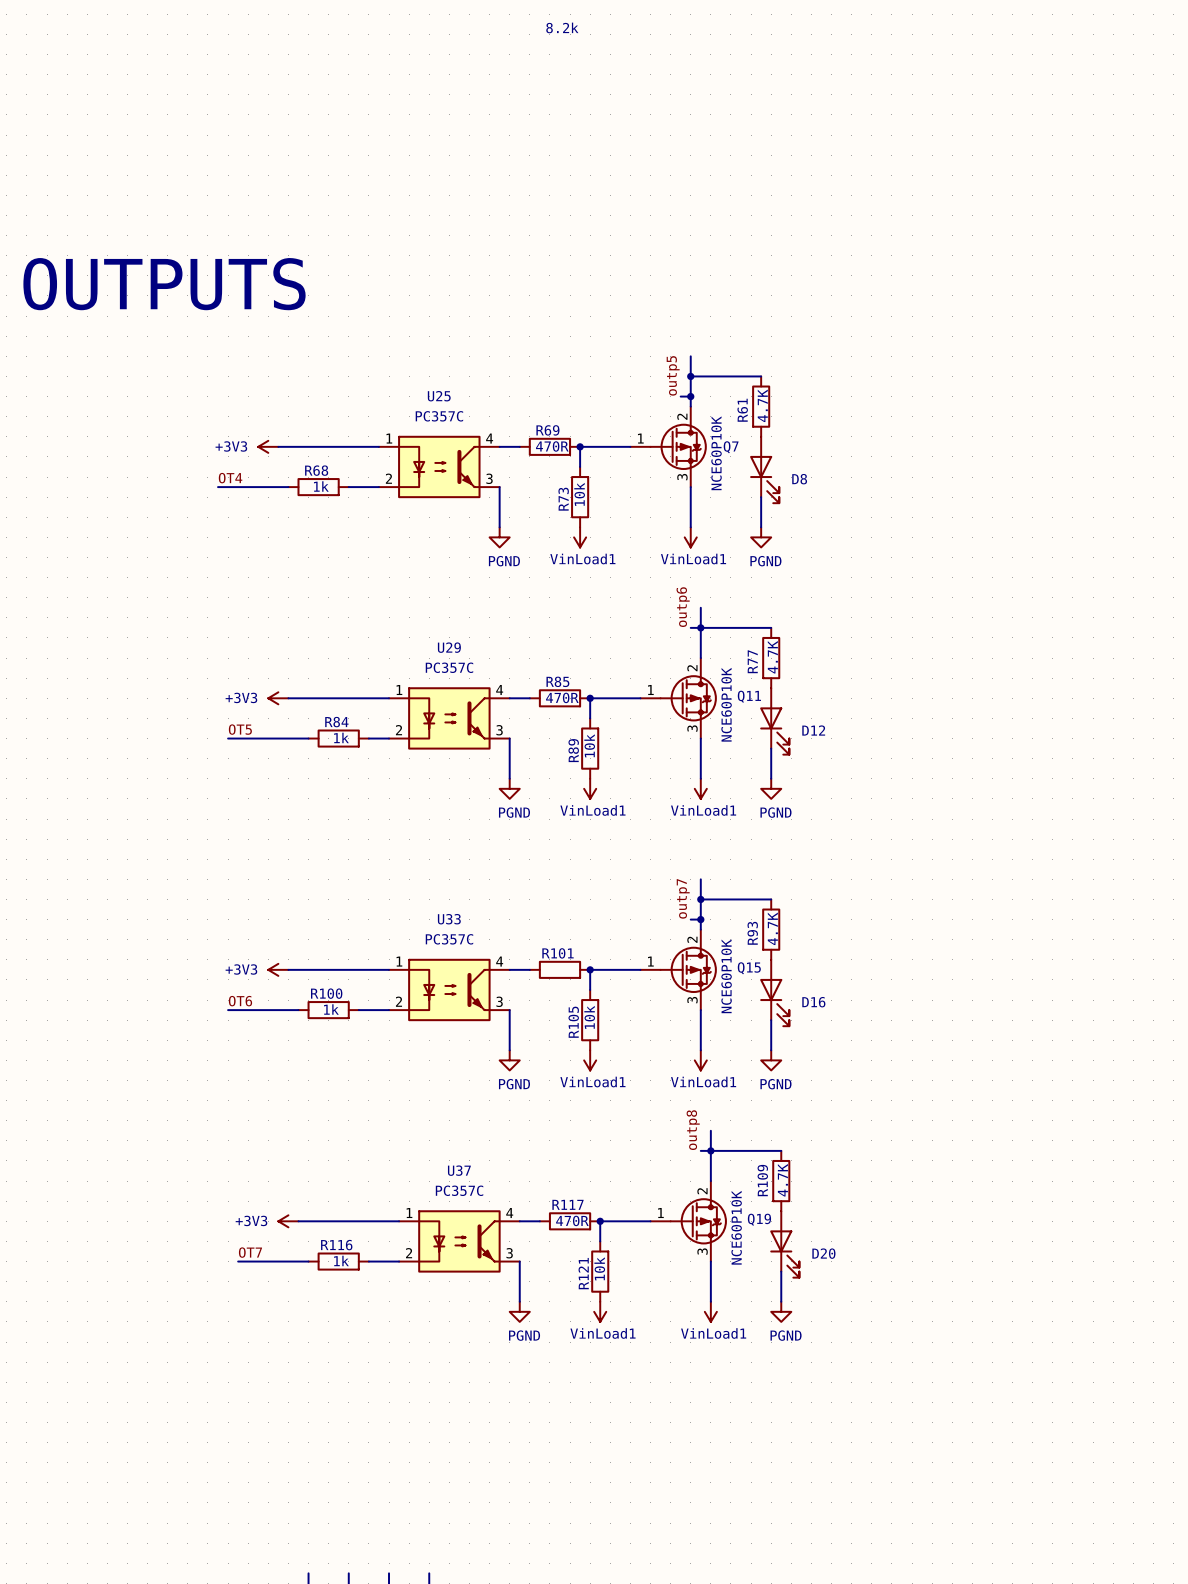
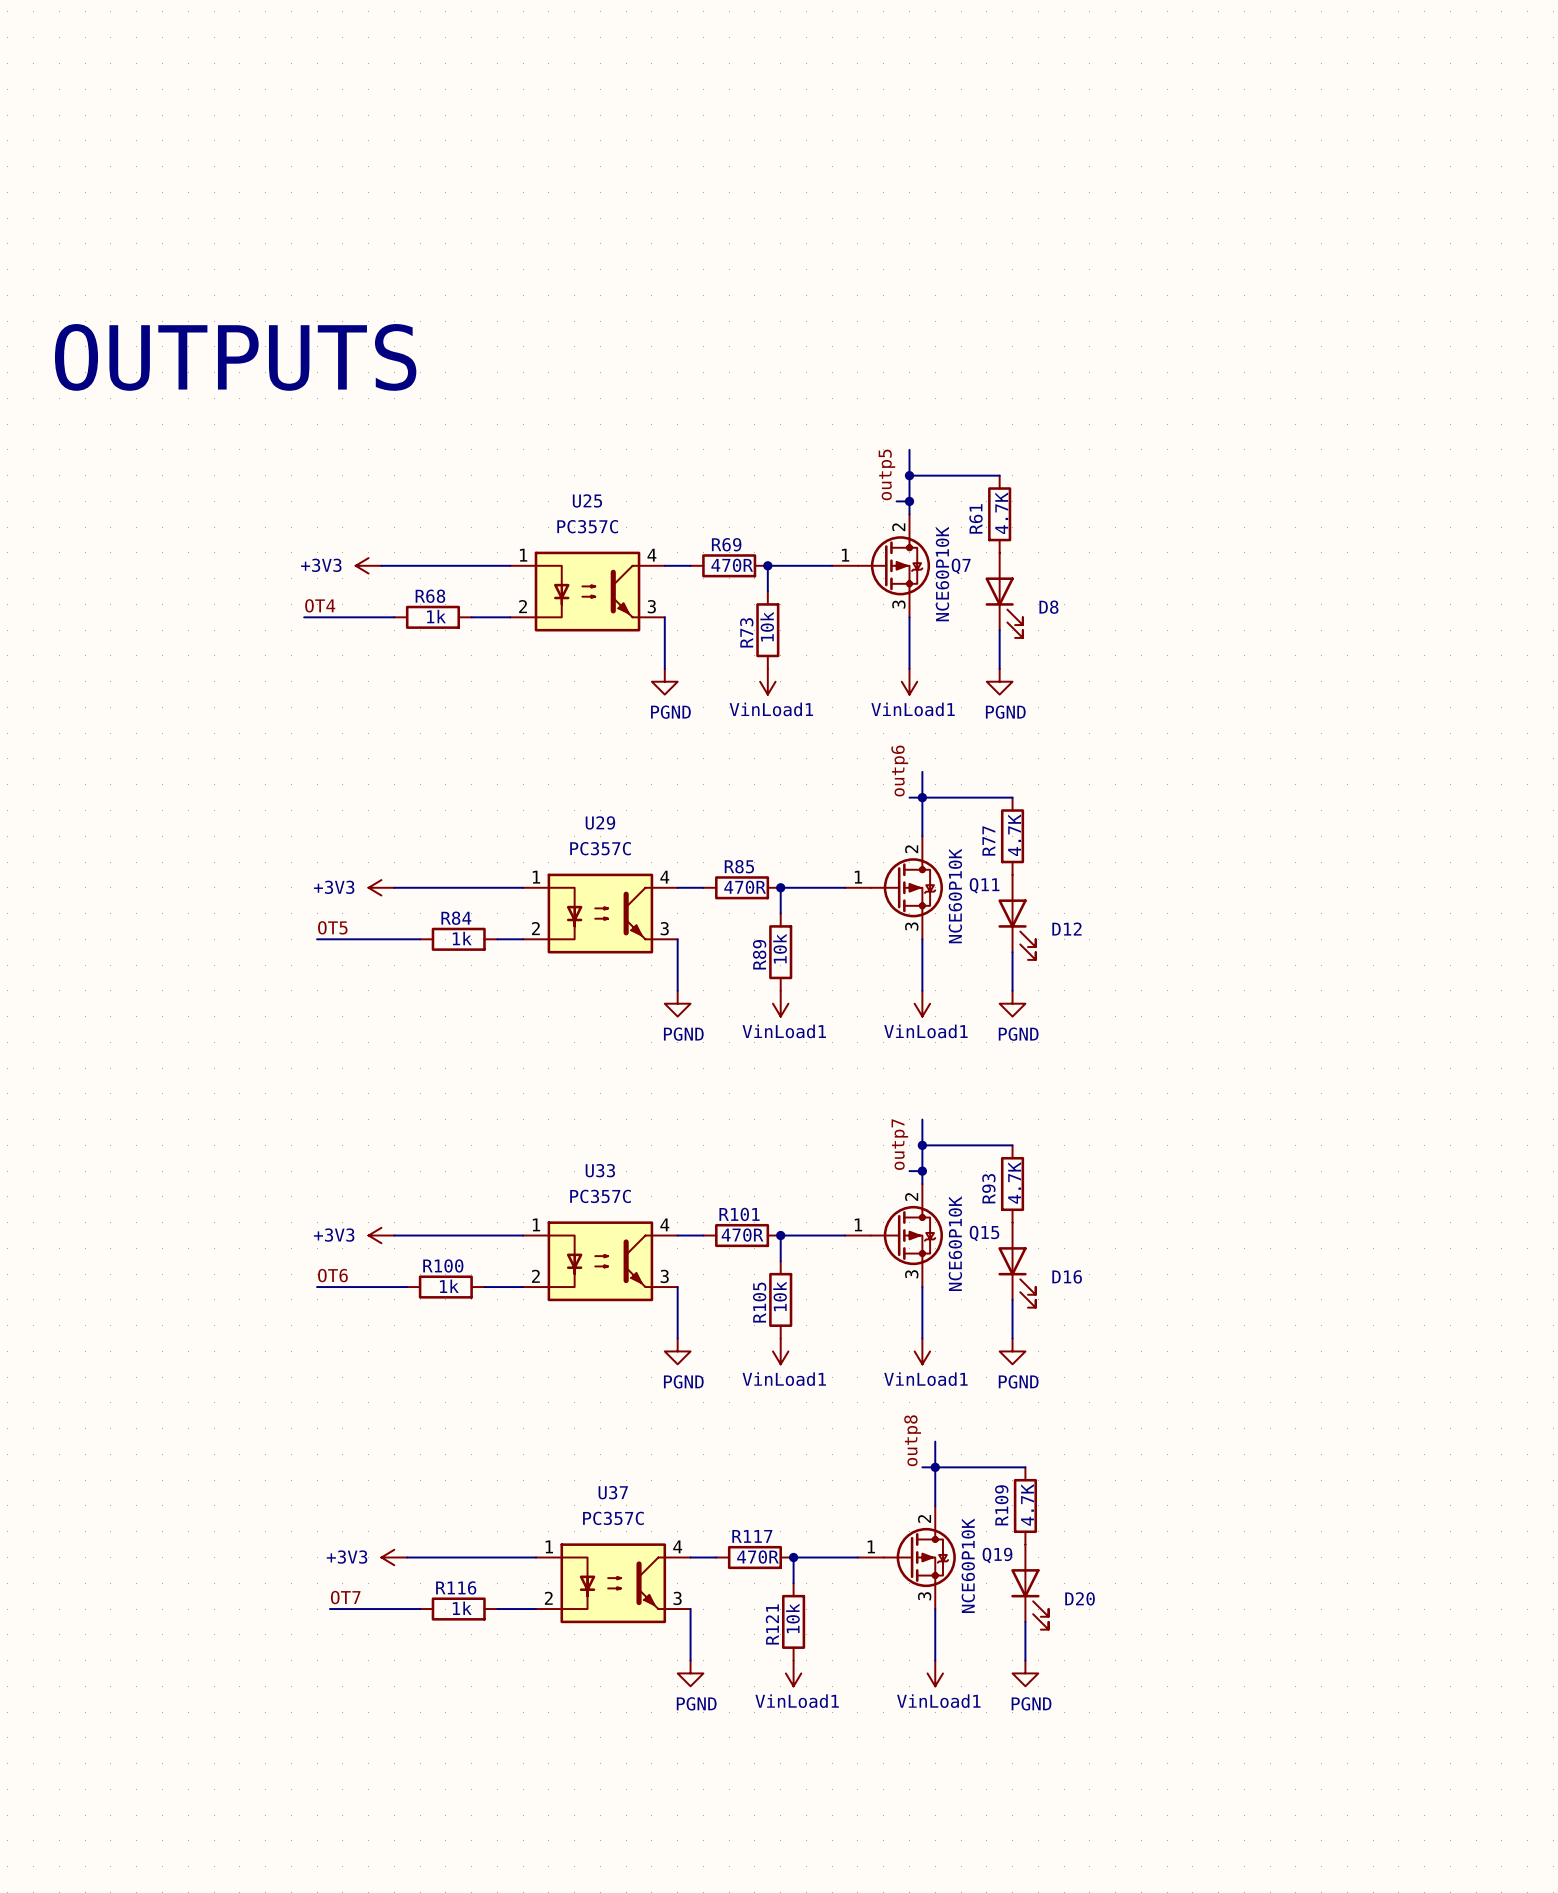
R101 value: 8.2k (562, 27) -> 470R (742, 1235)

